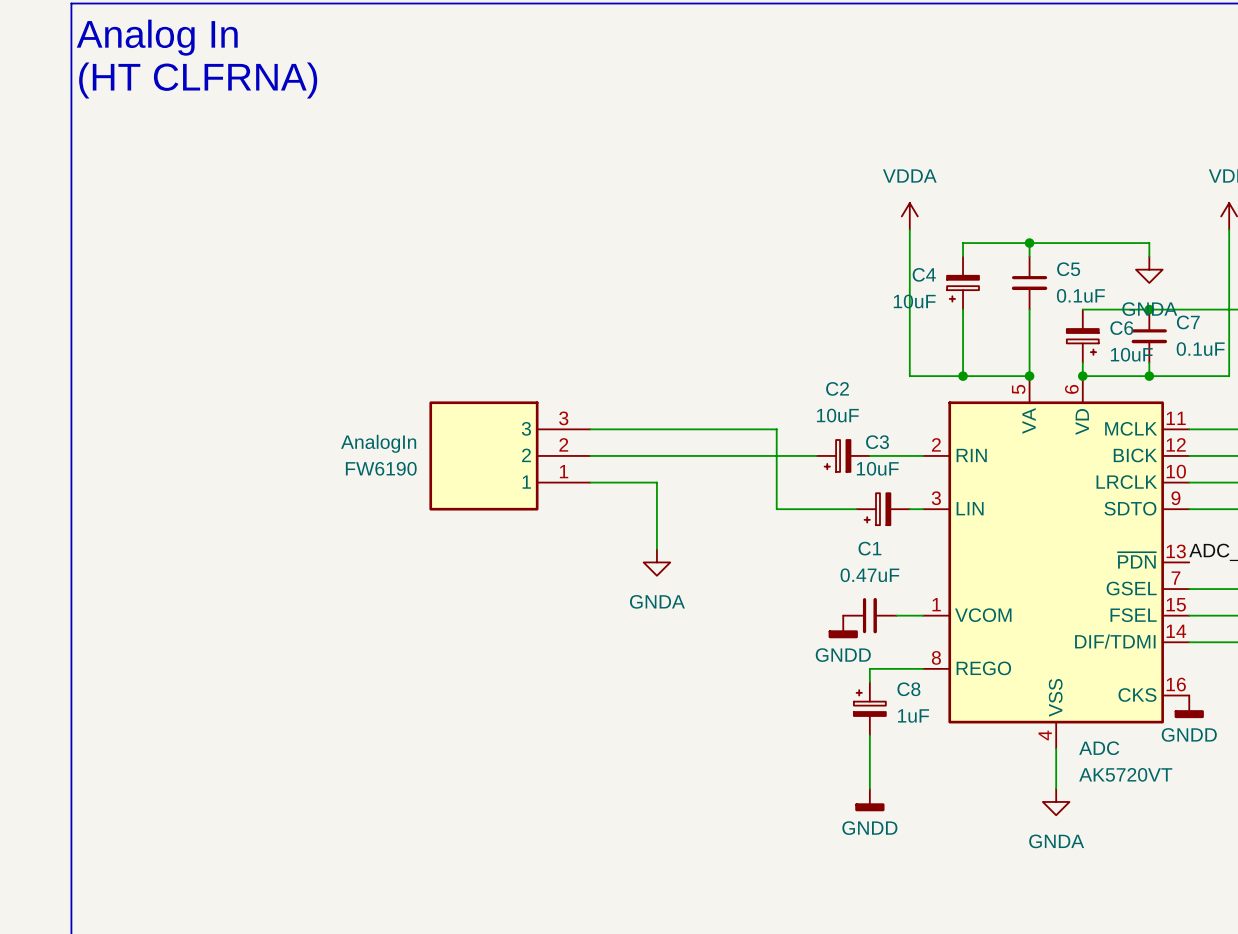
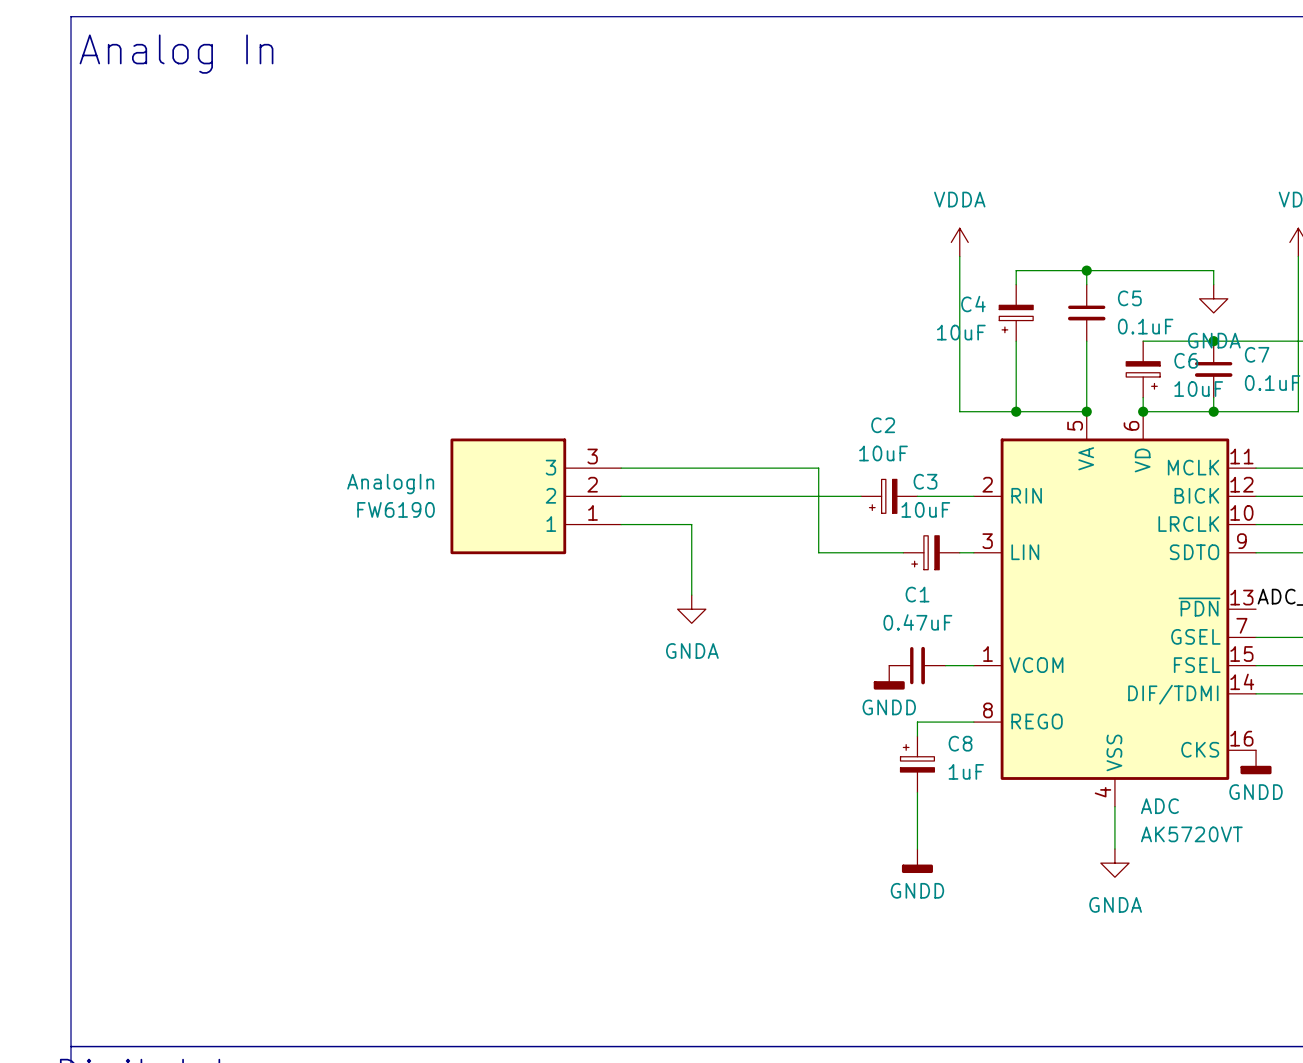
text: (HT CLFRNA) (198, 80) -> none

